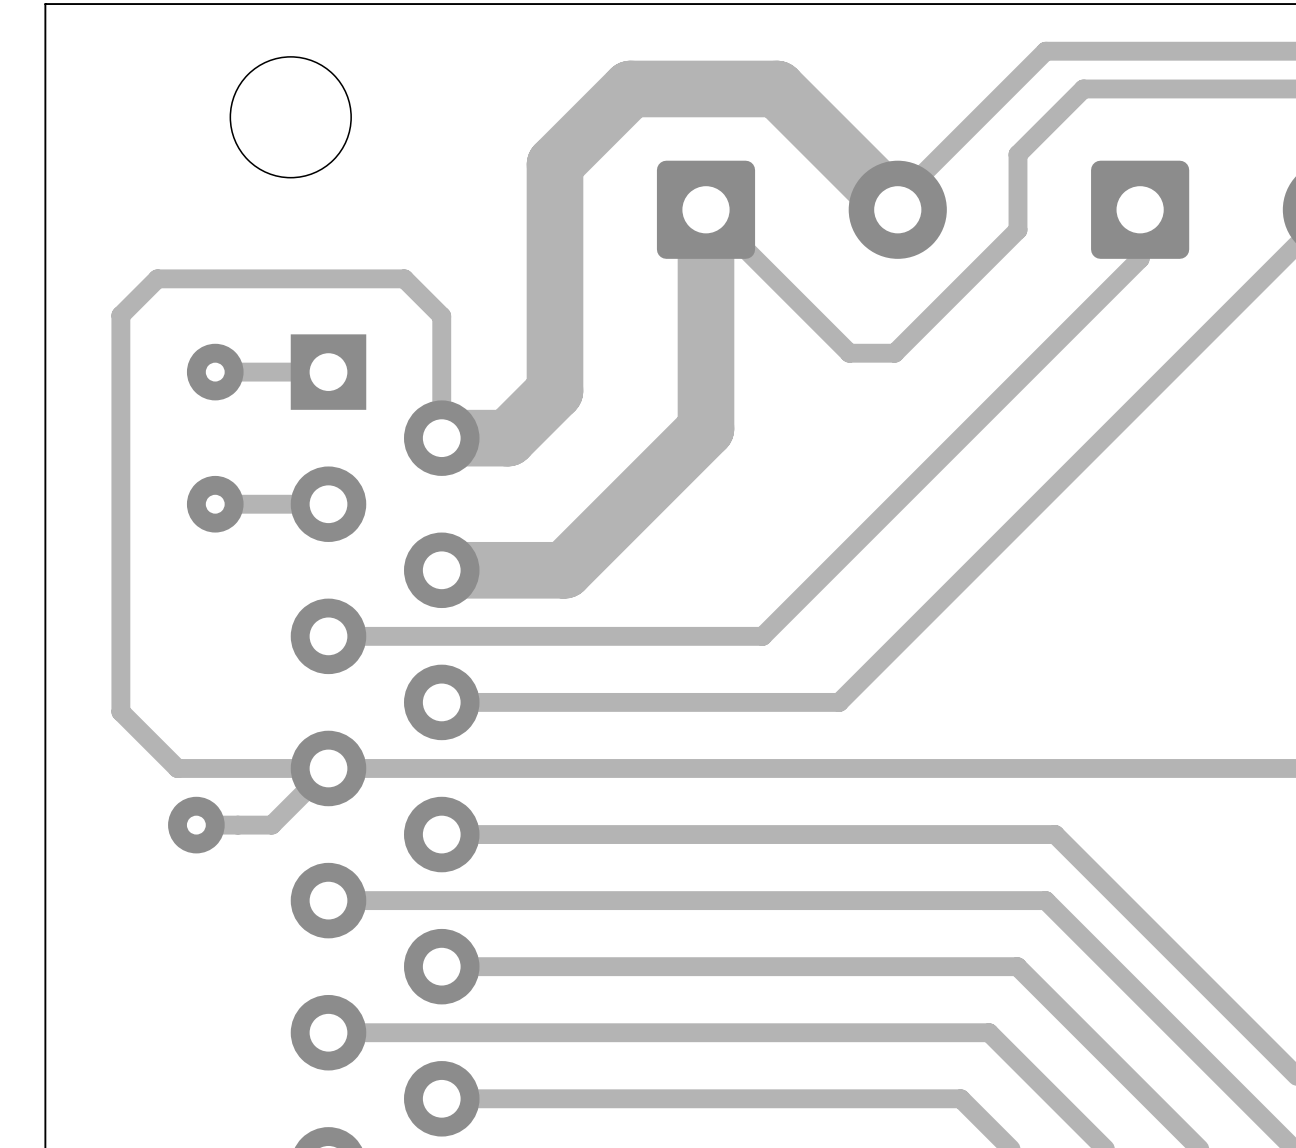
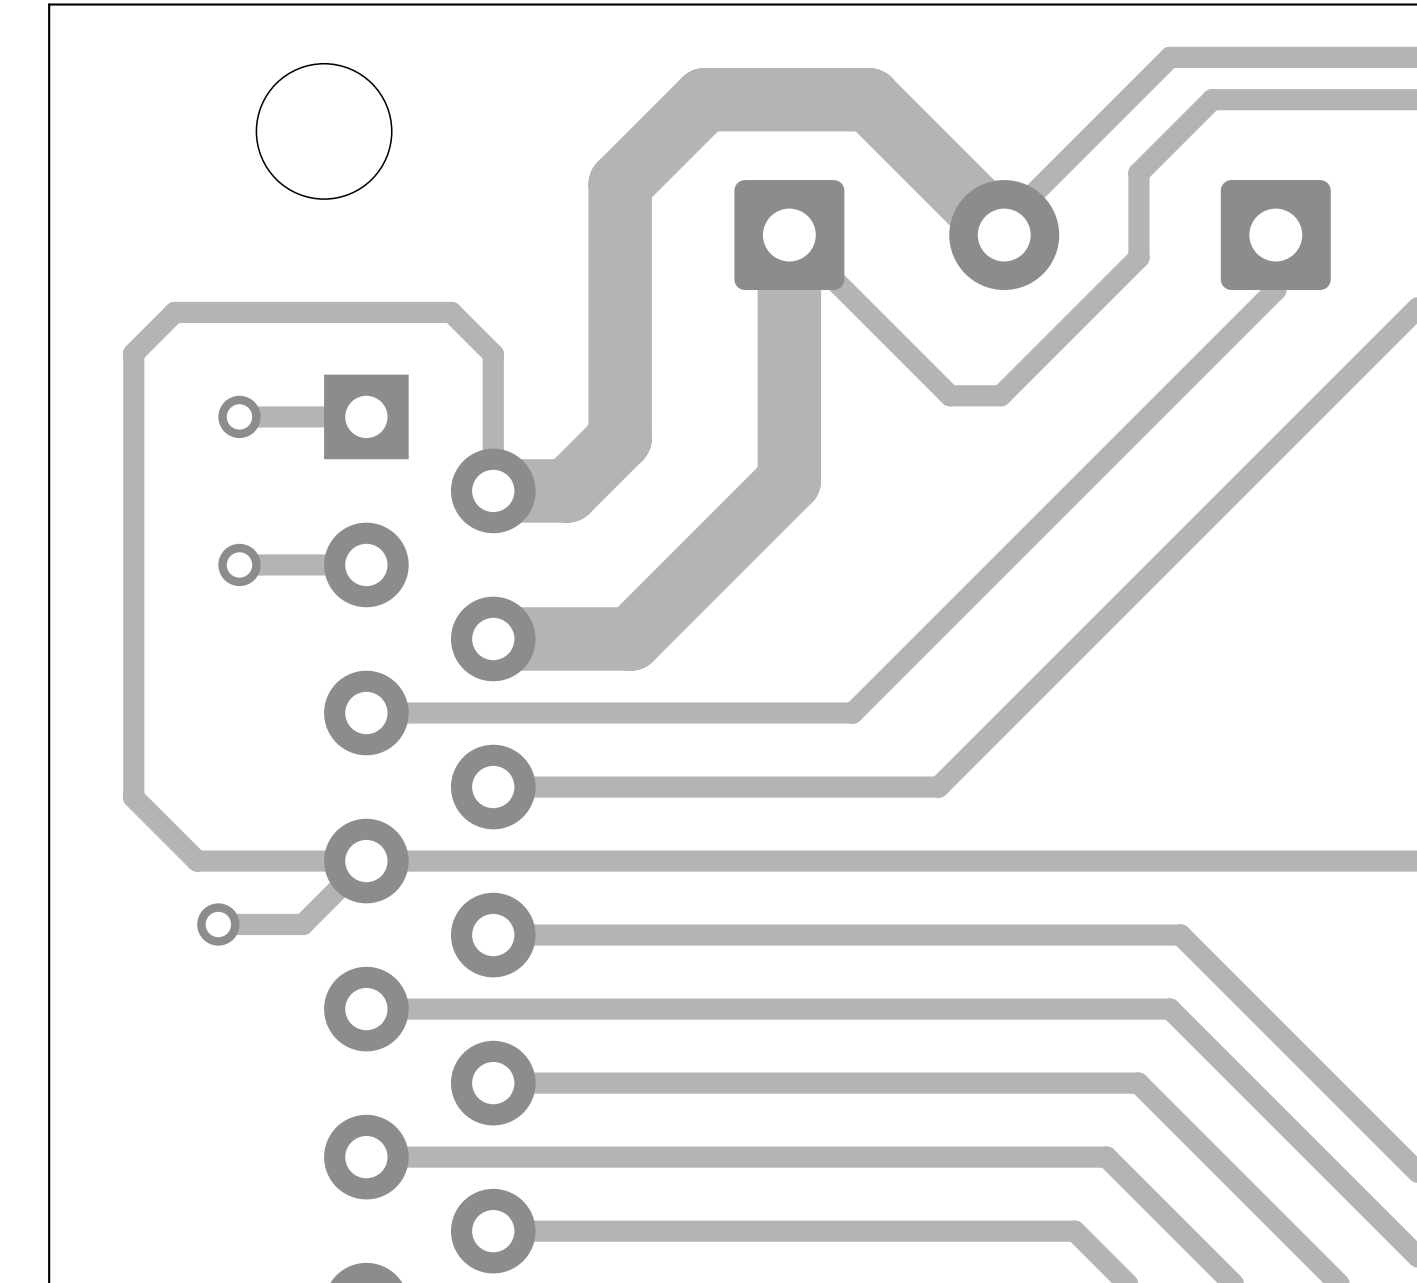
via size: [186, 343, 244, 401] -> [218, 395, 261, 439]
via size: [186, 475, 244, 533] -> [218, 543, 261, 587]
via size: [168, 796, 225, 854] -> [197, 903, 240, 946]

